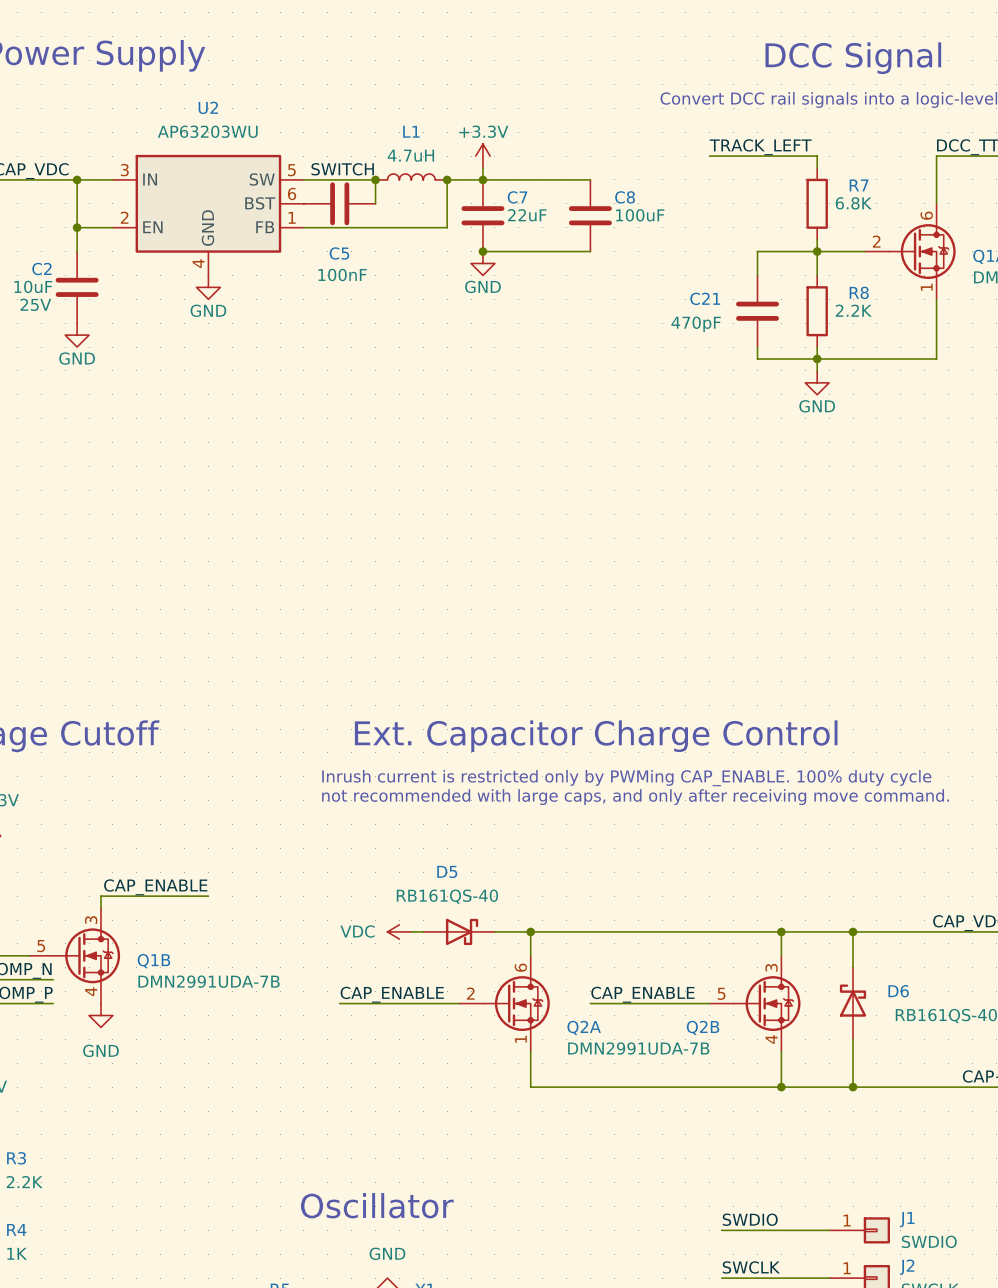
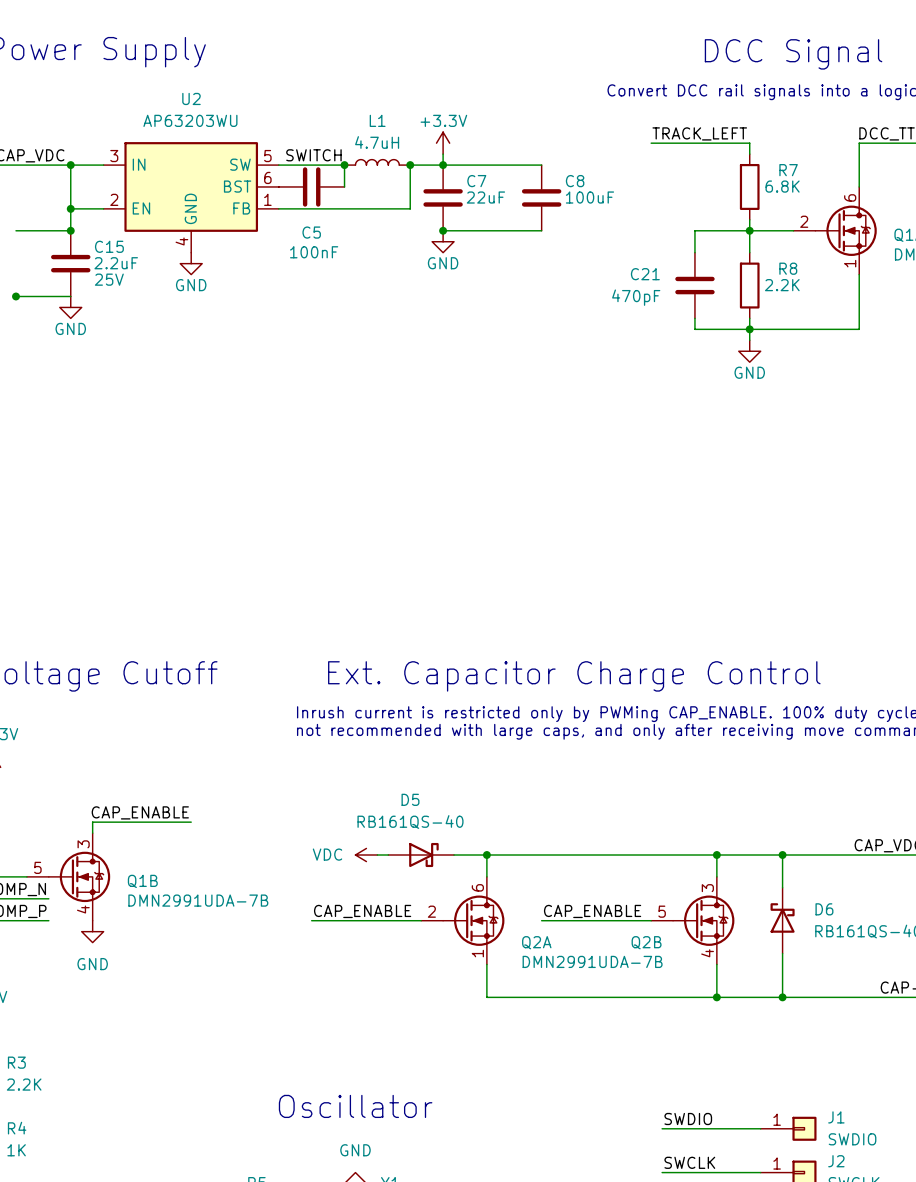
wire: none -> (15, 230) (70, 230)
junction: none -> (70, 230)
C2 name: C2 (41, 269) -> C15 (109, 246)
C2 value: 10uF (33, 286) -> 2.2uF (116, 263)
C2 text position: 25V (35, 304) -> 25V (109, 279)
wire: none -> (15, 296) (70, 296)
junction: none -> (15, 296)

